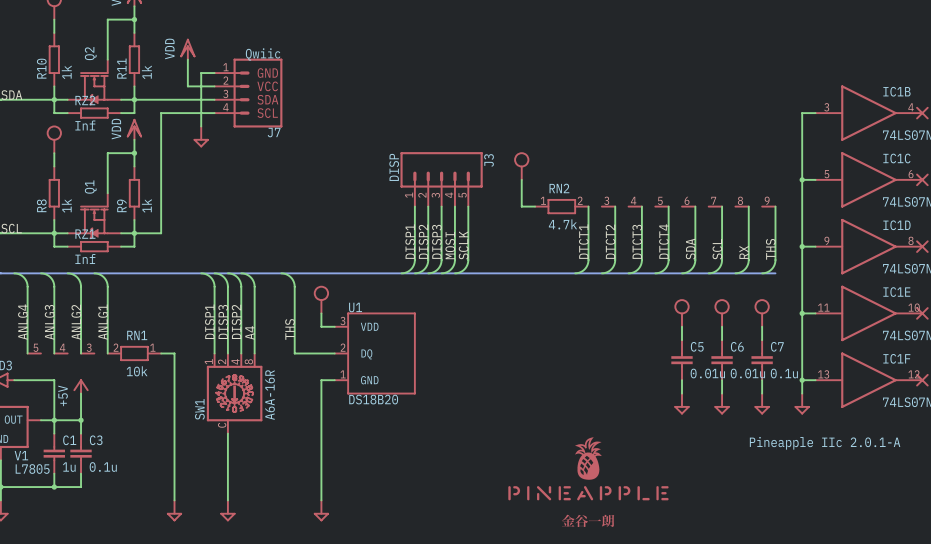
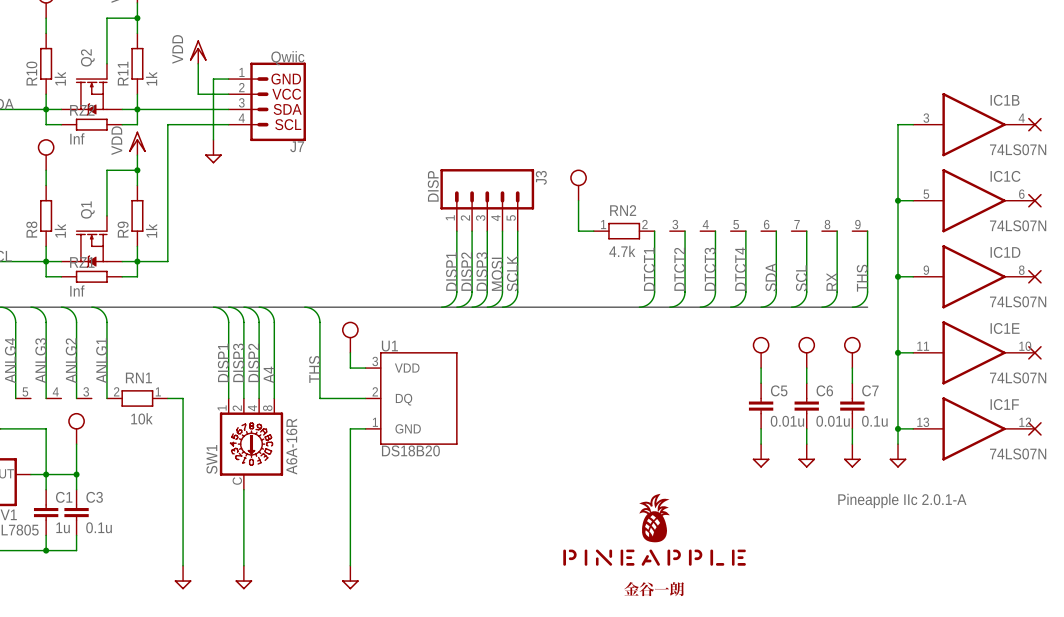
power symbol: none -> (76, 428)
power symbol: +5V (81, 386) -> none

